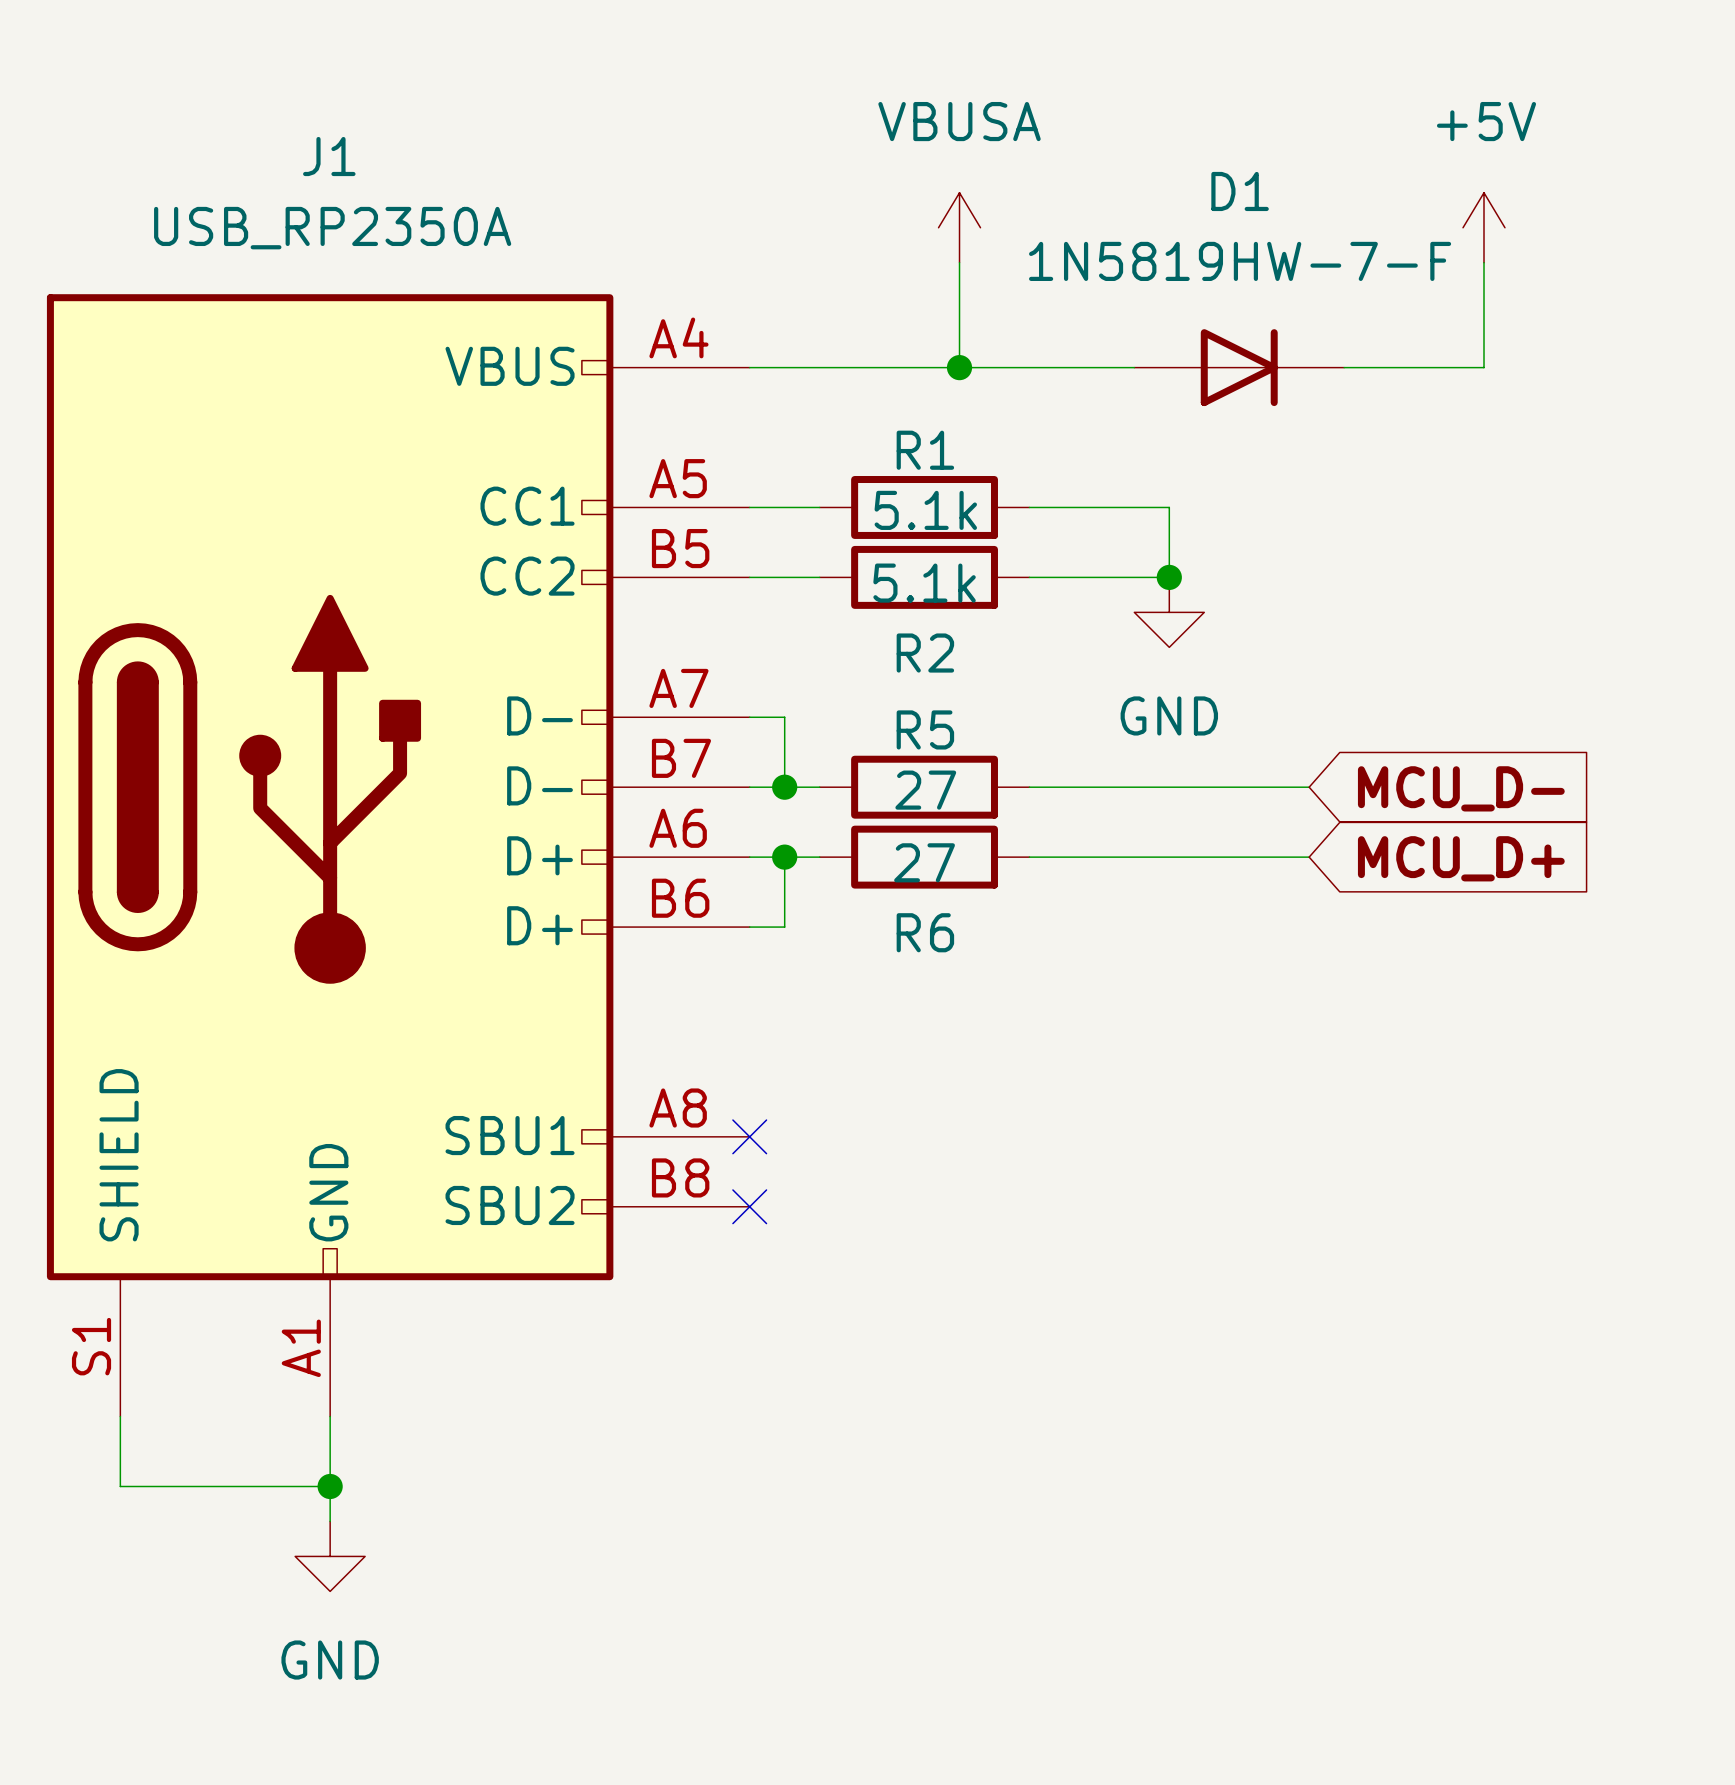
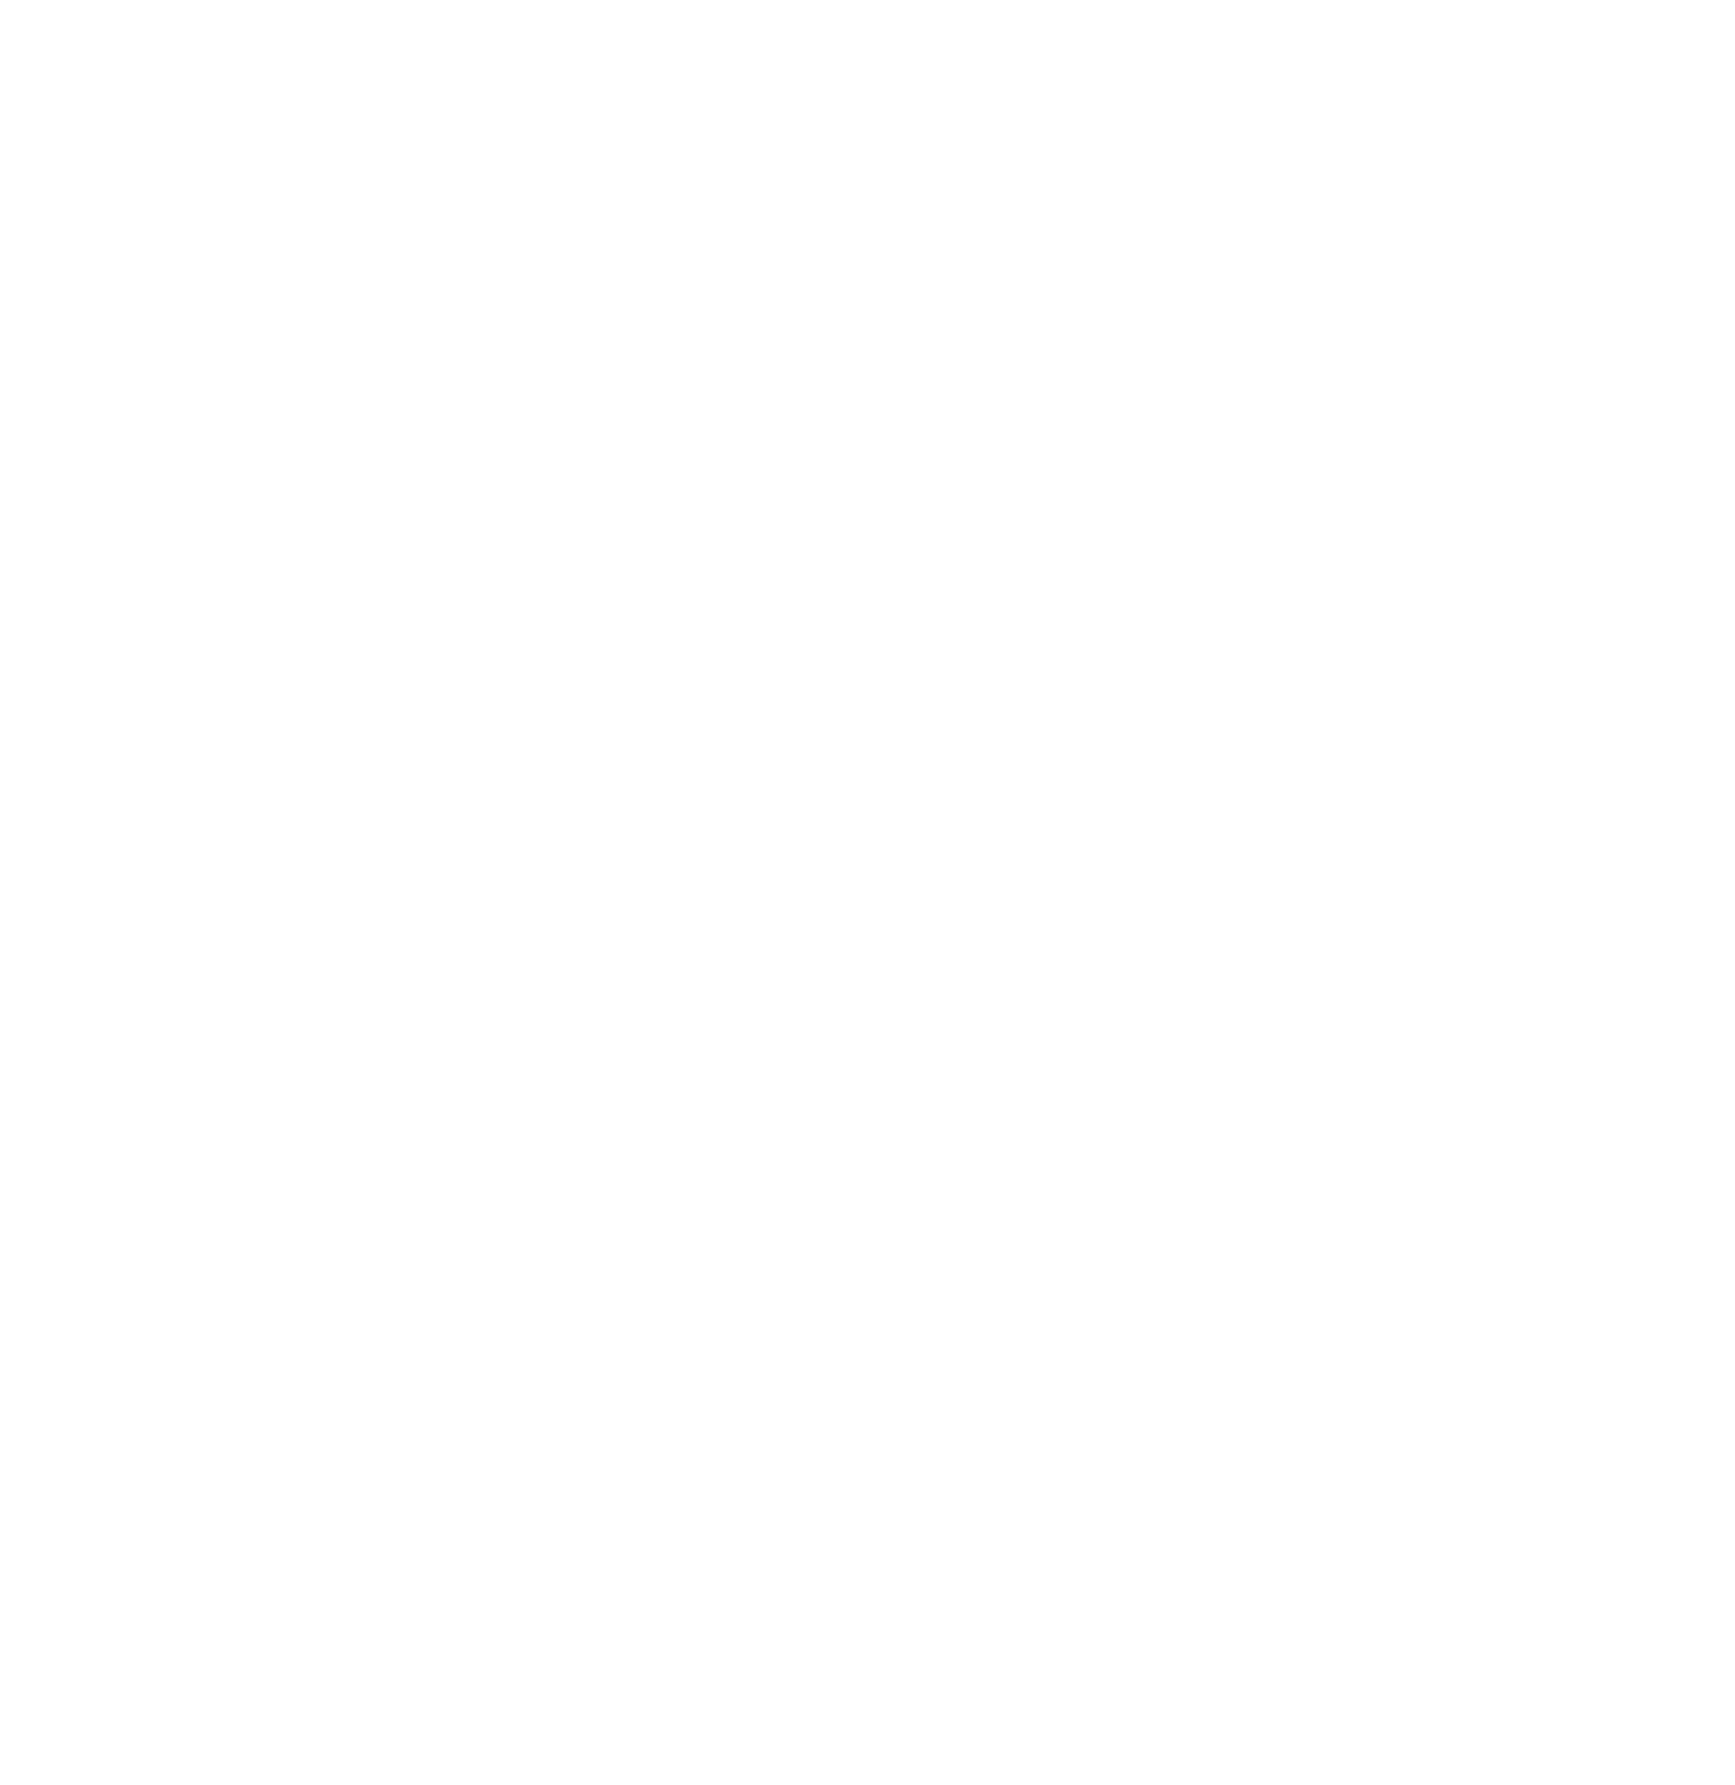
power symbol: VBUSA (959, 227) -> none
power symbol: +5V (1483, 227) -> none
wire: (959, 262) (959, 367) -> none
wire: (1483, 262) (1483, 367) (1344, 367) -> none
wire: (749, 367) (1134, 367) -> none
junction: (959, 367) -> none
D1: 1N5819HW-7-F (1239, 367) -> none
wire: (749, 507) (819, 507) -> none
R1: 5.1k (924, 507) -> none
wire: (1029, 507) (1169, 507) (1169, 577) (1029, 577) -> none
wire: (749, 577) (819, 577) -> none
R2: 5.1k (924, 577) -> none
junction: (1169, 577) -> none
power symbol: GND (1169, 612) -> none
wire: (749, 717) (784, 717) (784, 787) -> none
wire: (749, 787) (819, 787) -> none
junction: (784, 787) -> none
R5: 27 (924, 787) -> none
wire: (1029, 787) (1309, 787) -> none
global label: MCU_D- (1461, 788) -> none
J1: USB_RP2350A (398, 855) -> none
wire: (749, 857) (819, 857) -> none
wire: (784, 857) (784, 927) (749, 927) -> none
junction: (784, 857) -> none
R6: 27 (924, 857) -> none
wire: (1029, 857) (1309, 857) -> none
global label: MCU_D+ (1461, 858) -> none
no-connect mark: (749, 1136) -> none
no-connect mark: (749, 1206) -> none
wire: (120, 1416) (120, 1486) (330, 1486) -> none
wire: (330, 1416) (330, 1521) -> none
junction: (330, 1486) -> none
power symbol: GND (330, 1556) -> none

